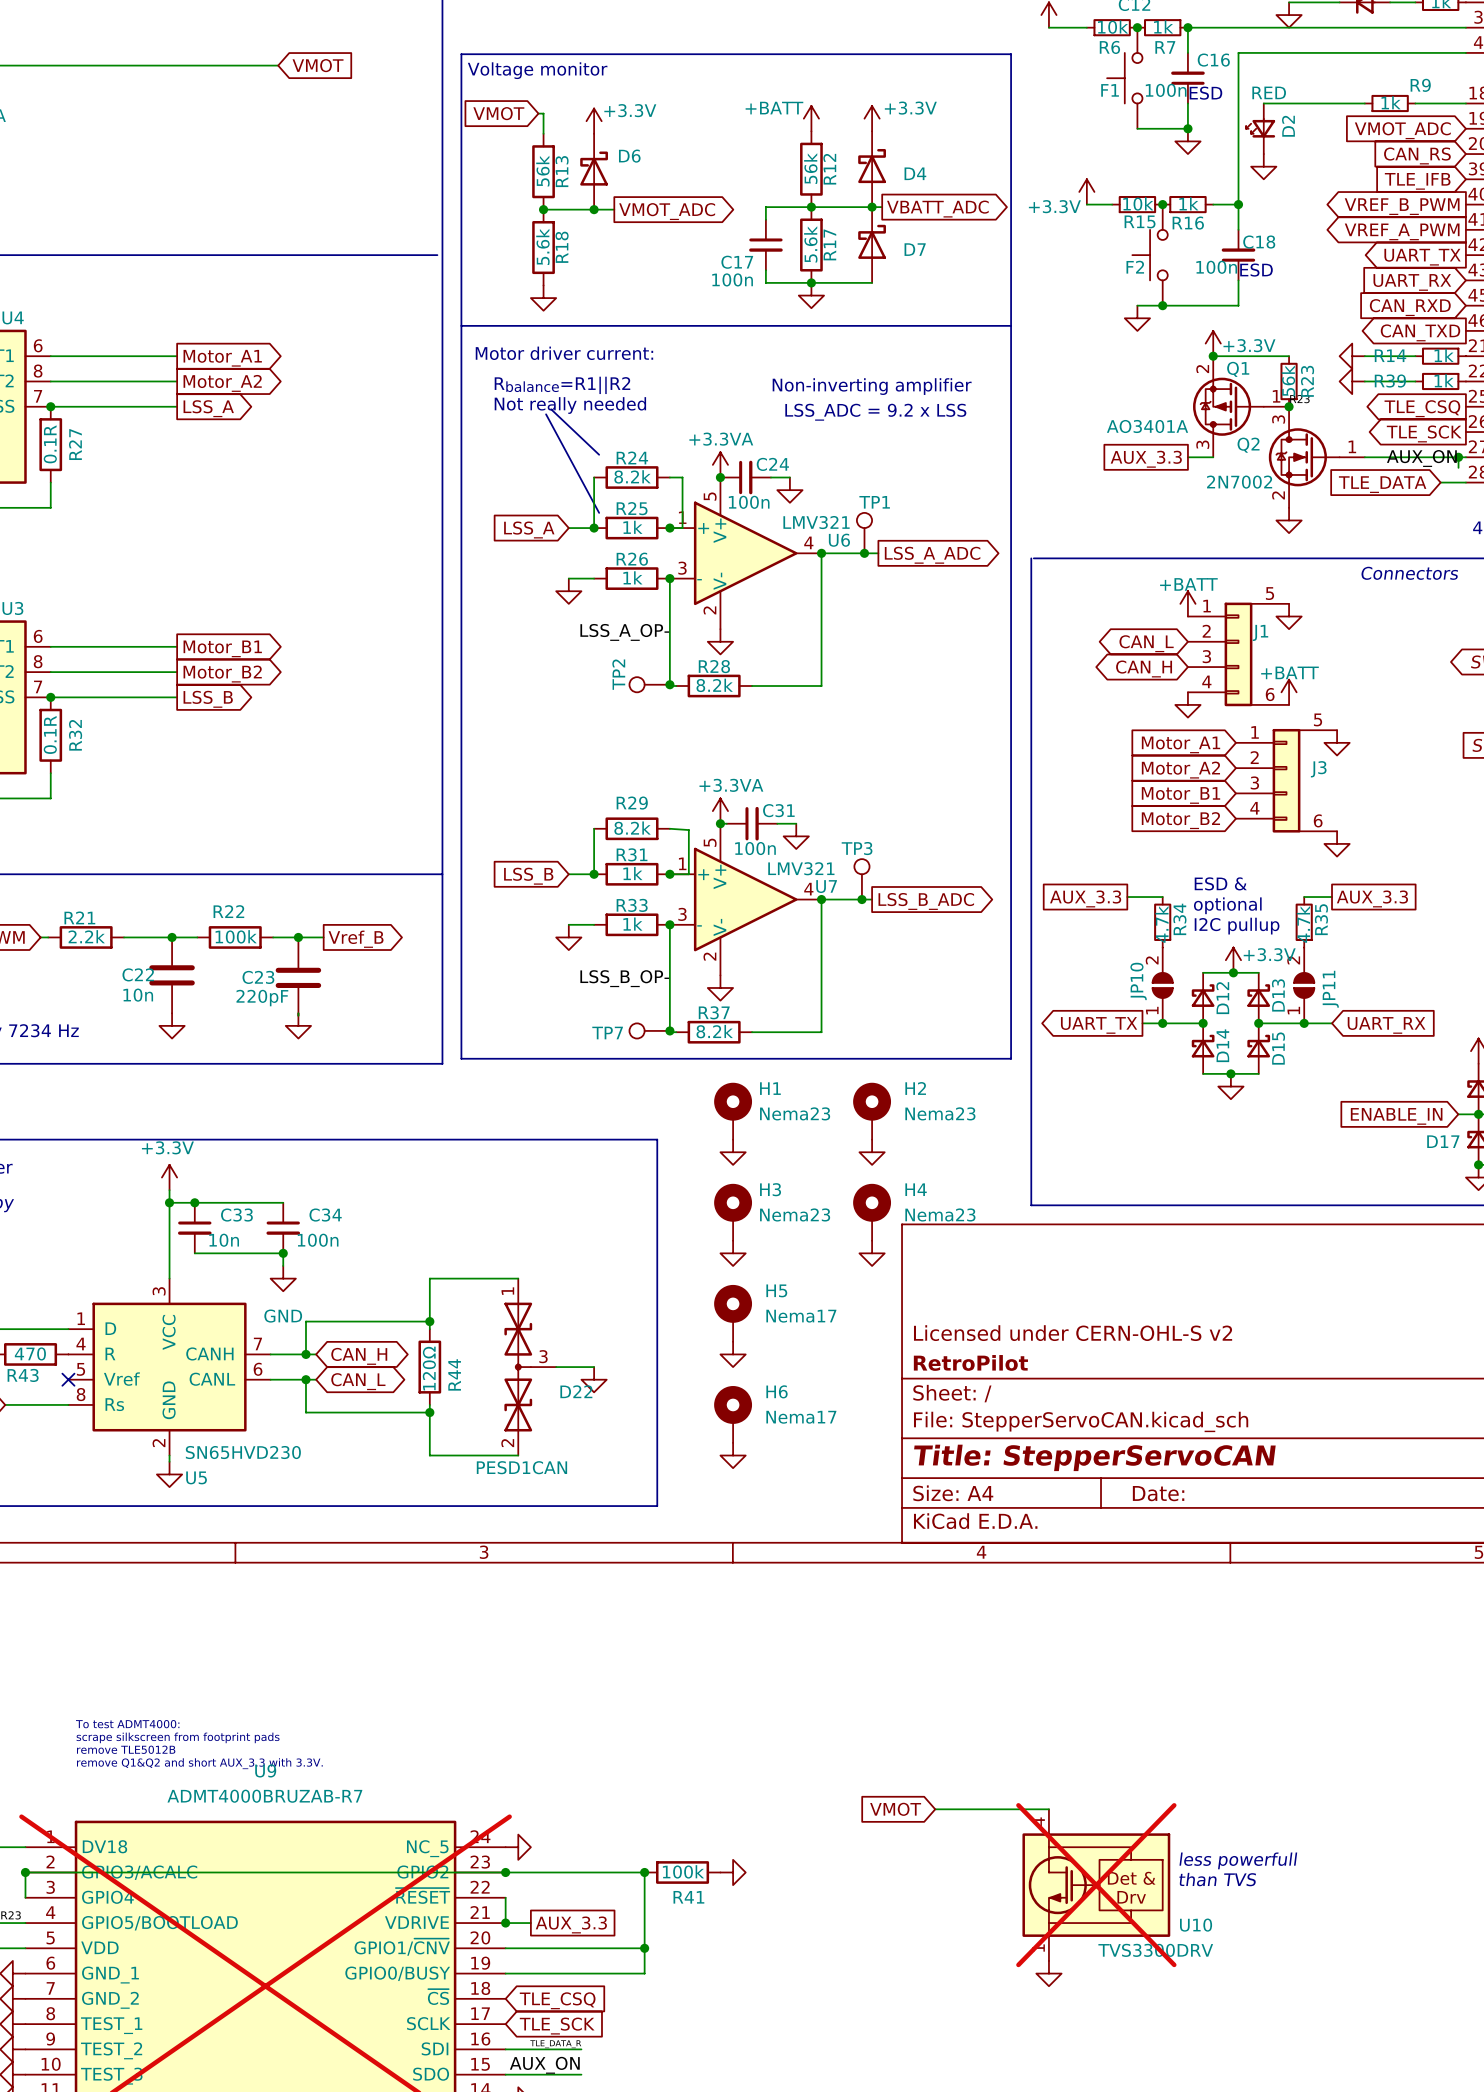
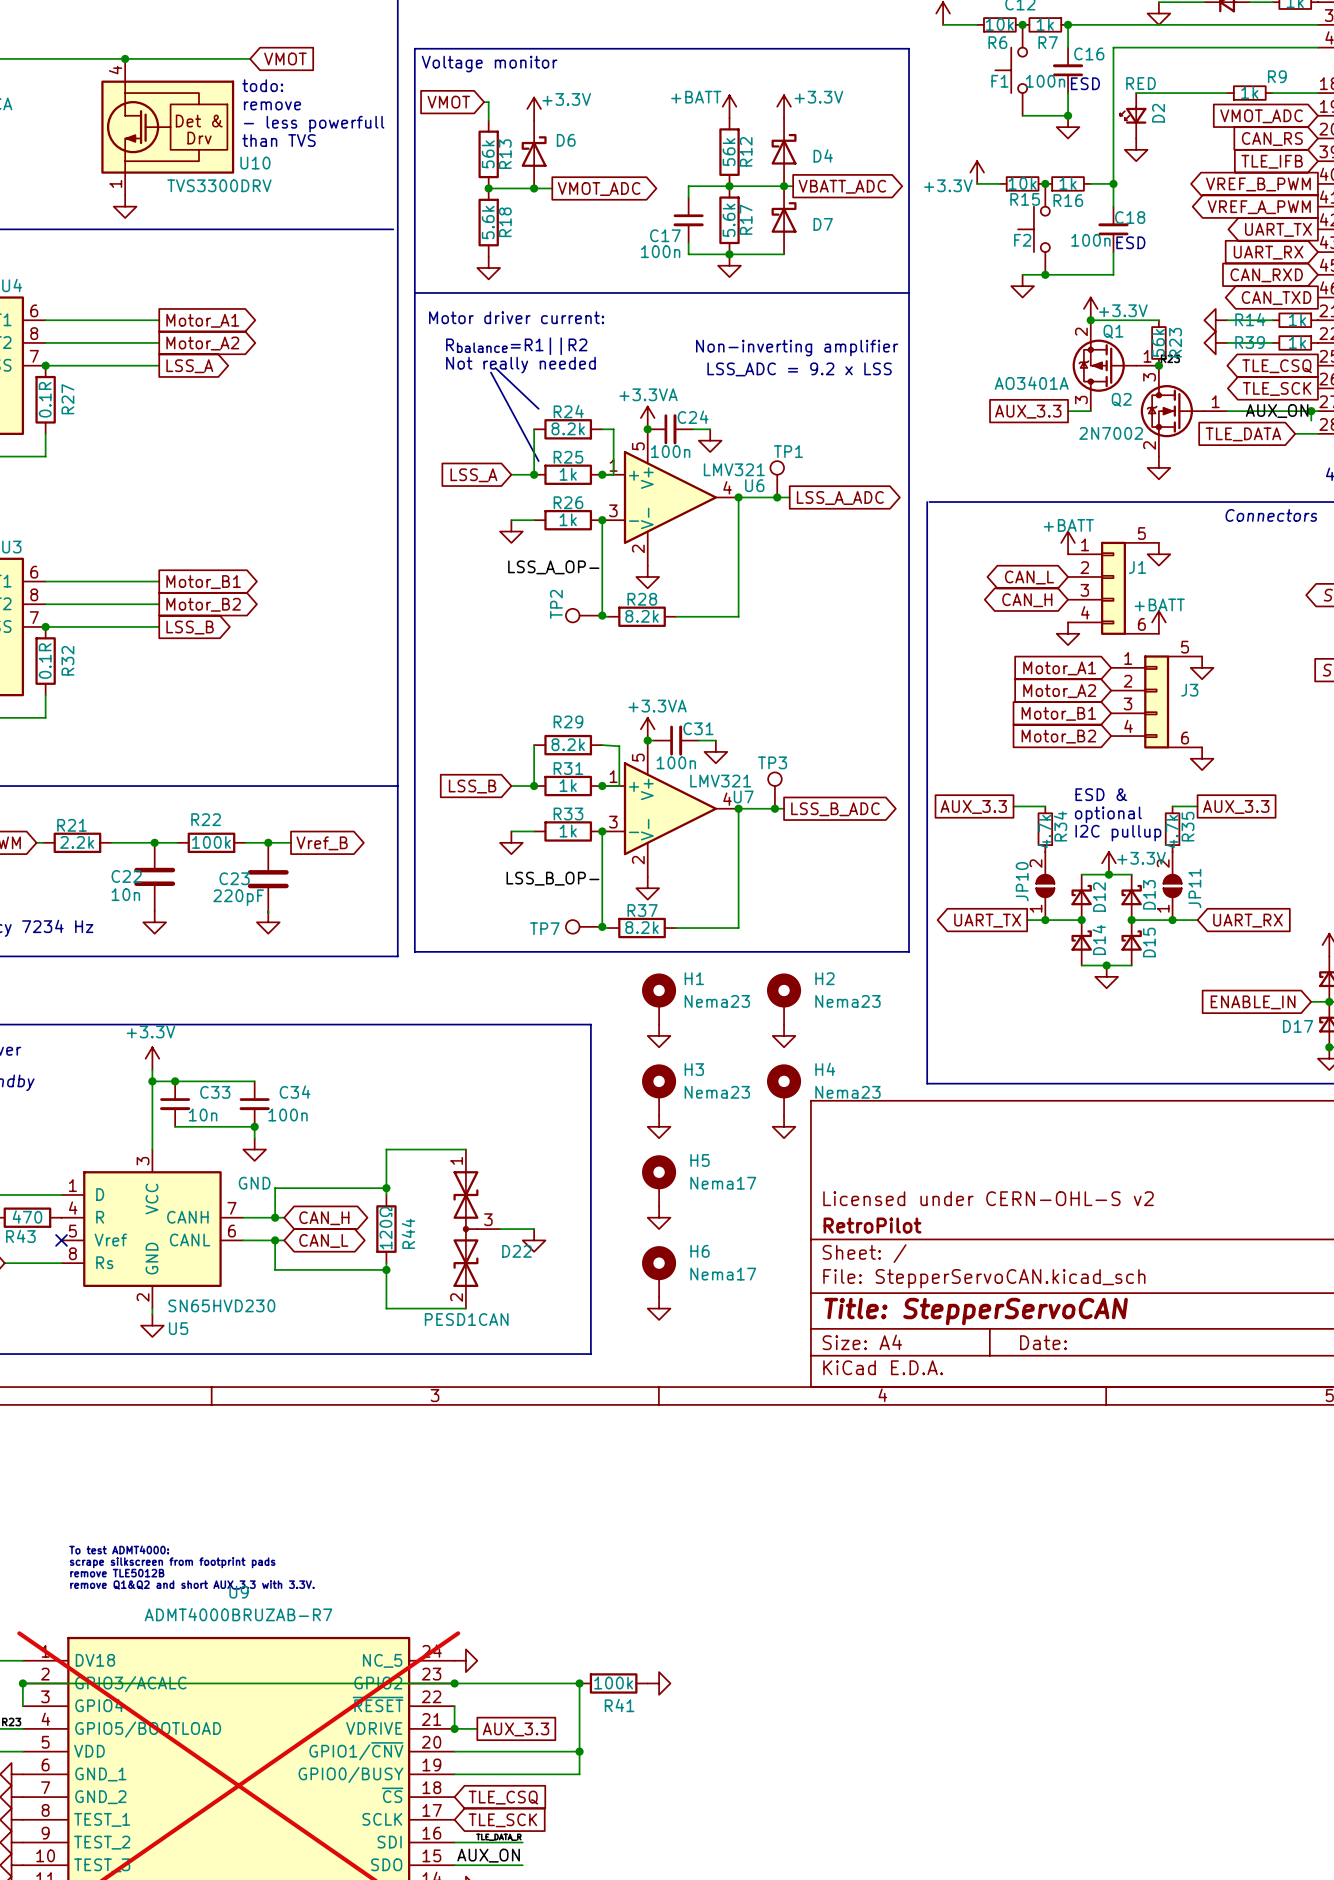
junction: none -> (125, 58)
text: none -> todo: (262, 85)
text: none -> remove (272, 105)
text: none -> - less powerfull (314, 124)
text: none -> than TVS (278, 140)
power symbol: none -> (125, 206)
global label: VMOT (895, 1809) -> none
wire: (935, 1809) (1048, 1809) -> none
text: less powerfull (1238, 1860) -> none
text: than TVS (1217, 1879) -> none
U10 position: (1096, 1885) -> (167, 127)
U10 do-not-place cross: (1096, 1885) -> none
power symbol: (1048, 1973) -> none

